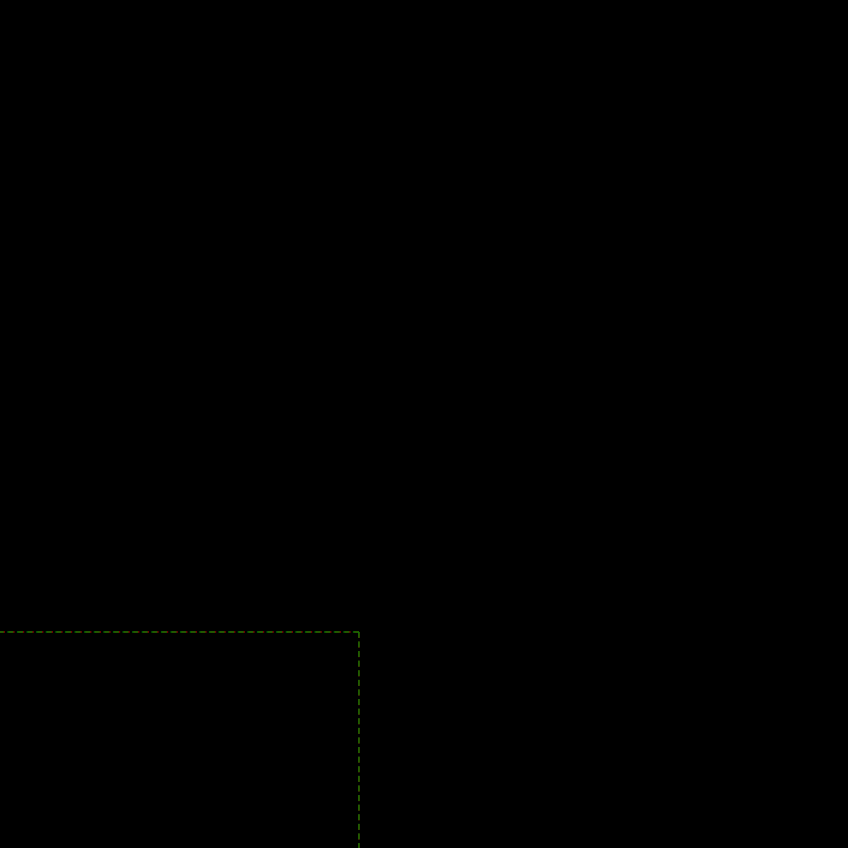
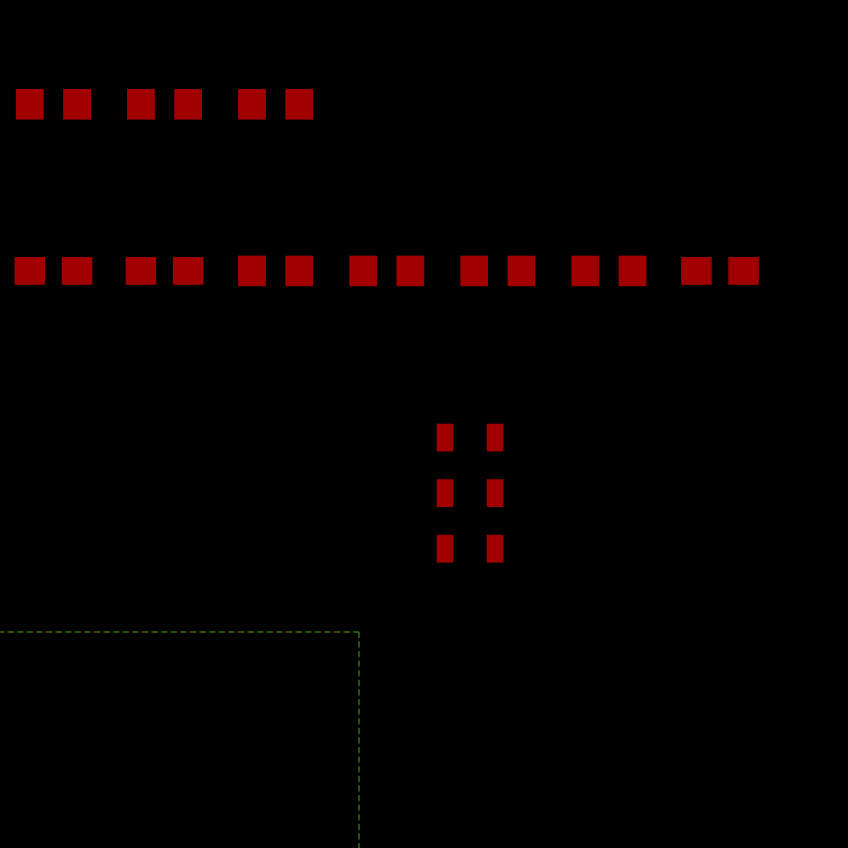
part: none -> (53, 104)
part: none -> (164, 104)
part: none -> (275, 104)
part: none -> (53, 270)
part: none -> (164, 270)
part: none -> (275, 270)
part: none -> (386, 270)
part: none -> (497, 270)
part: none -> (608, 270)
part: none -> (720, 270)
part: none -> (470, 437)
part: none -> (470, 493)
part: none -> (470, 548)

